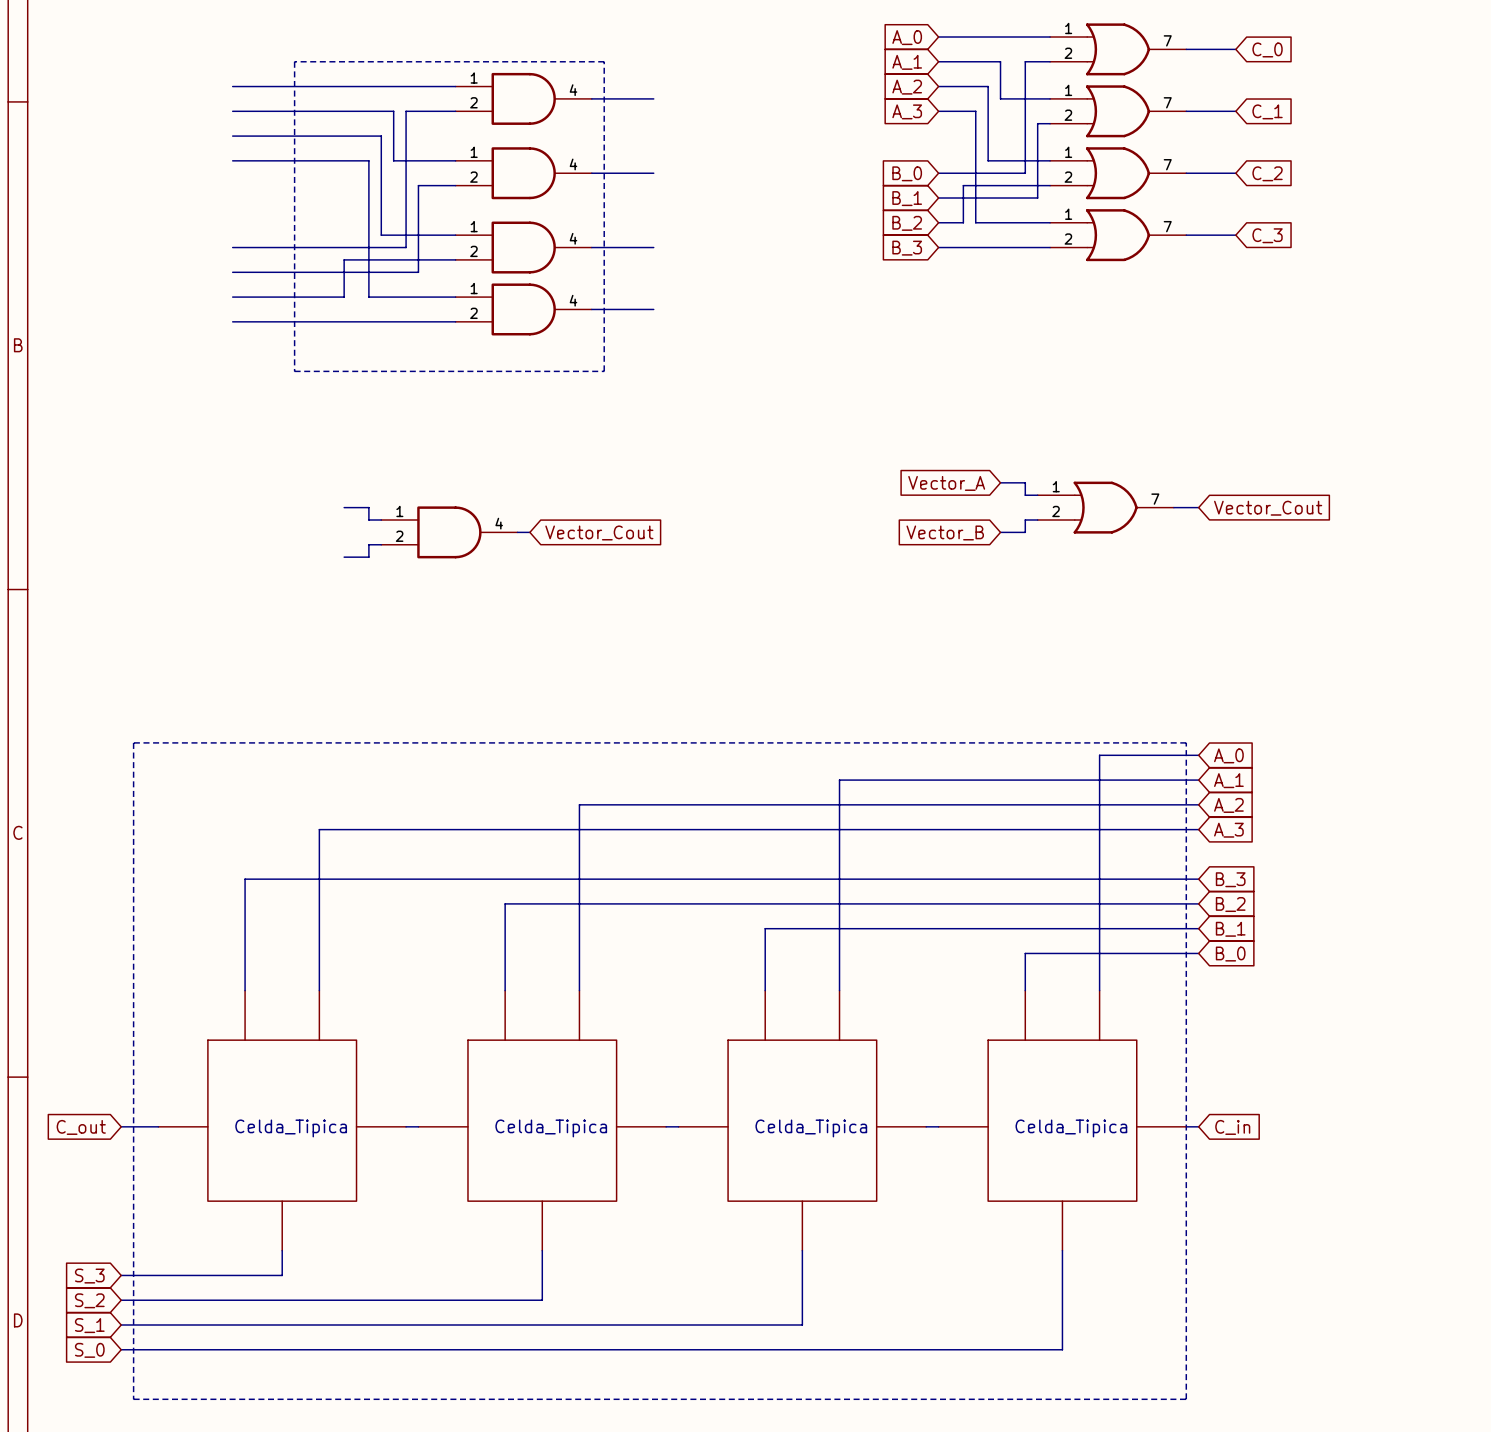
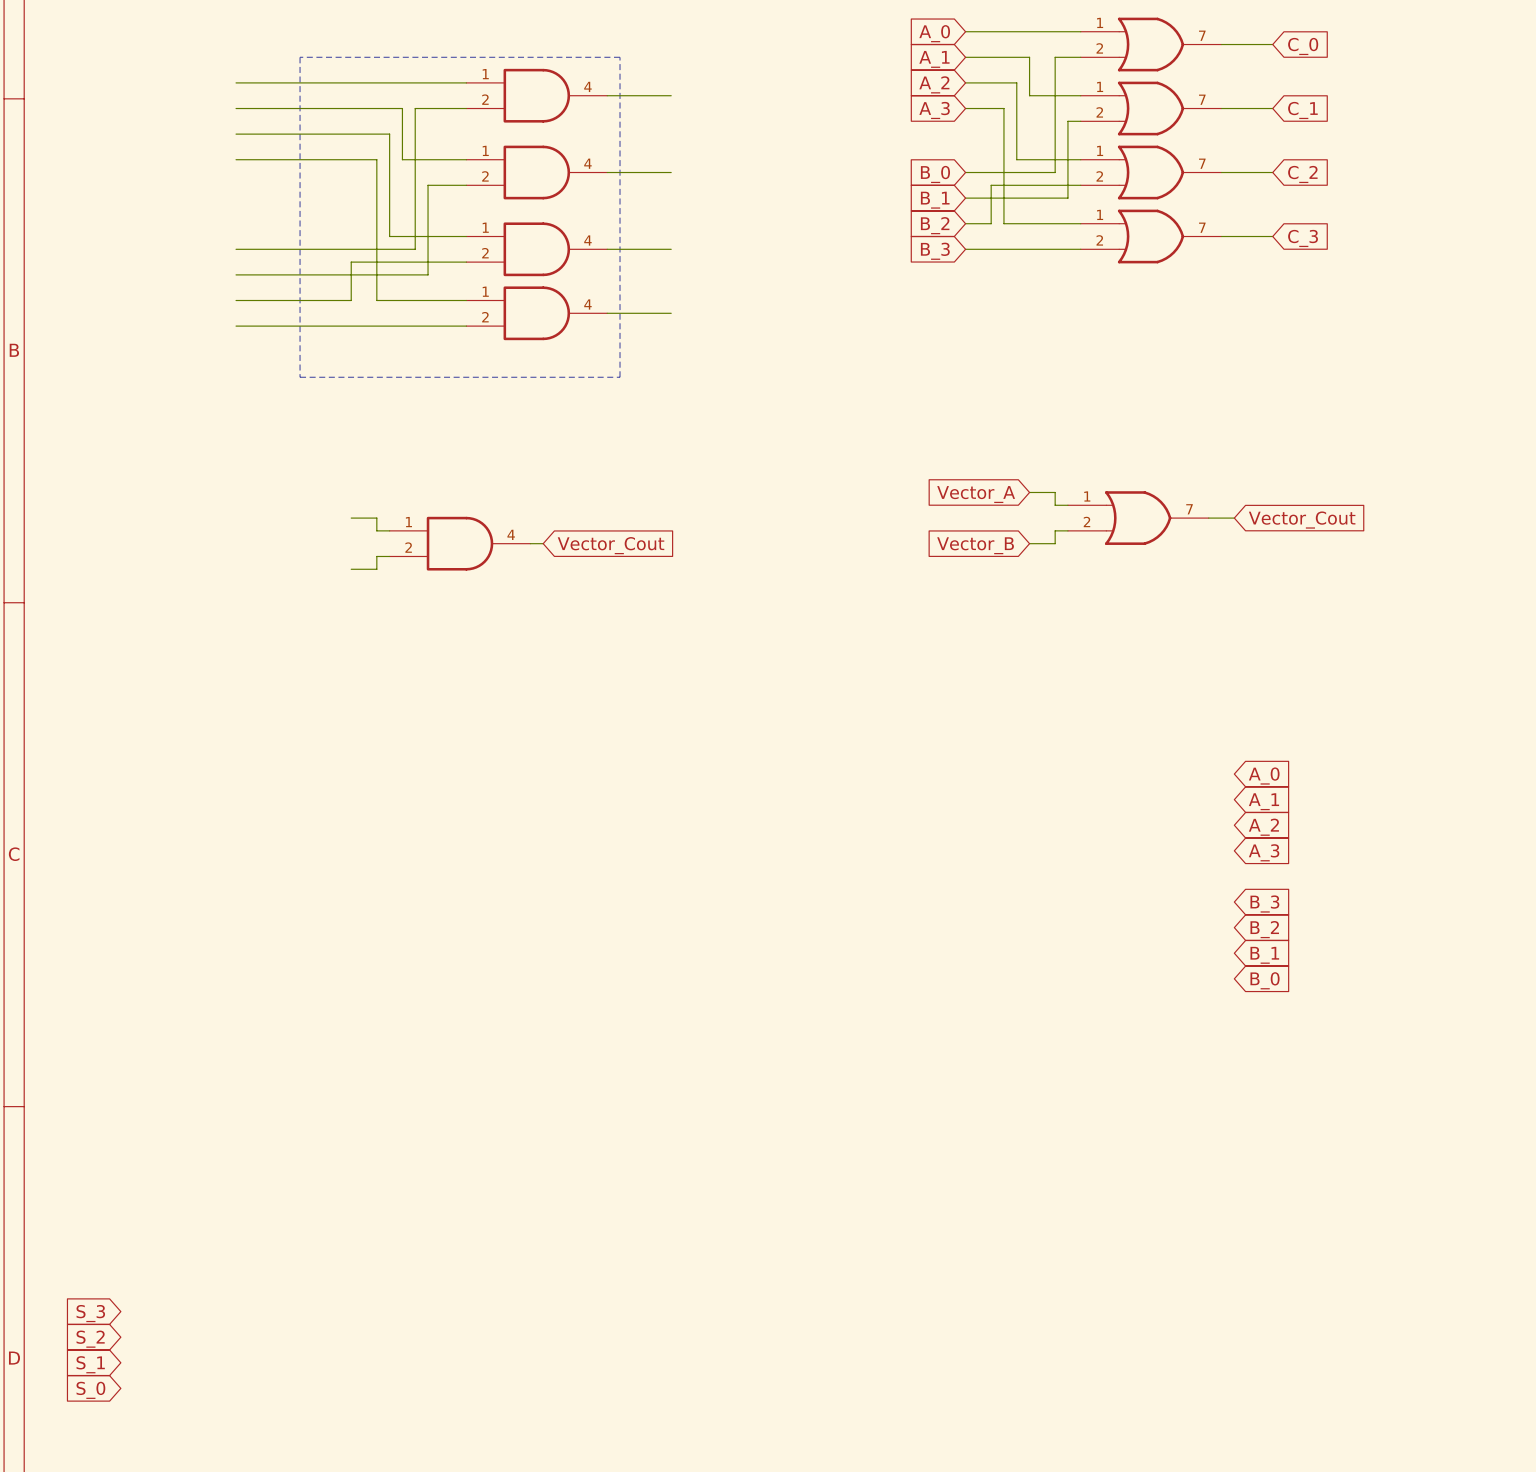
line: (133, 742) (1186, 742) (1186, 1399) (133, 1399) (133, 742) -> none
wire: (1198, 755) (1099, 755) (1099, 990) -> none
wire: (1198, 780) (839, 780) (839, 990) -> none
wire: (1198, 804) (579, 804) (579, 990) -> none
wire: (1198, 829) (319, 829) (319, 990) -> none
wire: (1198, 879) (245, 879) (245, 990) -> none
wire: (1198, 903) (505, 903) (505, 990) -> none
wire: (1198, 928) (765, 928) (765, 990) -> none
wire: (1198, 953) (1025, 953) (1025, 990) -> none
part: Celda_Tipica (282, 1120) -> none
part: Celda_Tipica (542, 1120) -> none
part: Celda_Tipica (802, 1120) -> none
part: Celda_Tipica (1062, 1120) -> none
wire: (121, 1126) (158, 1126) -> none
wire: (406, 1126) (418, 1126) -> none
wire: (666, 1126) (678, 1126) -> none
wire: (926, 1126) (938, 1126) -> none
wire: (1186, 1126) (1198, 1126) -> none
global label: C_out (81, 1127) -> none
global label: C_in (1232, 1127) -> none
wire: (282, 1250) (282, 1275) (121, 1275) -> none
wire: (542, 1250) (542, 1300) (121, 1300) -> none
wire: (802, 1250) (802, 1324) (121, 1324) -> none
wire: (1062, 1250) (1062, 1349) (121, 1349) -> none

